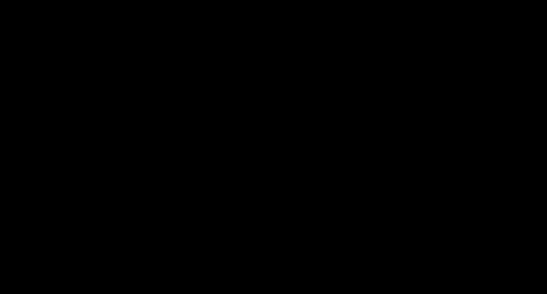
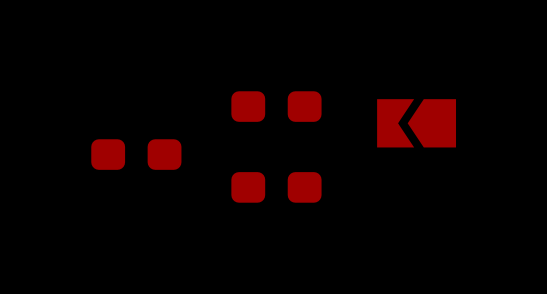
part: none -> (276, 106)
part: none -> (416, 123)
part: none -> (136, 154)
part: none -> (276, 187)

